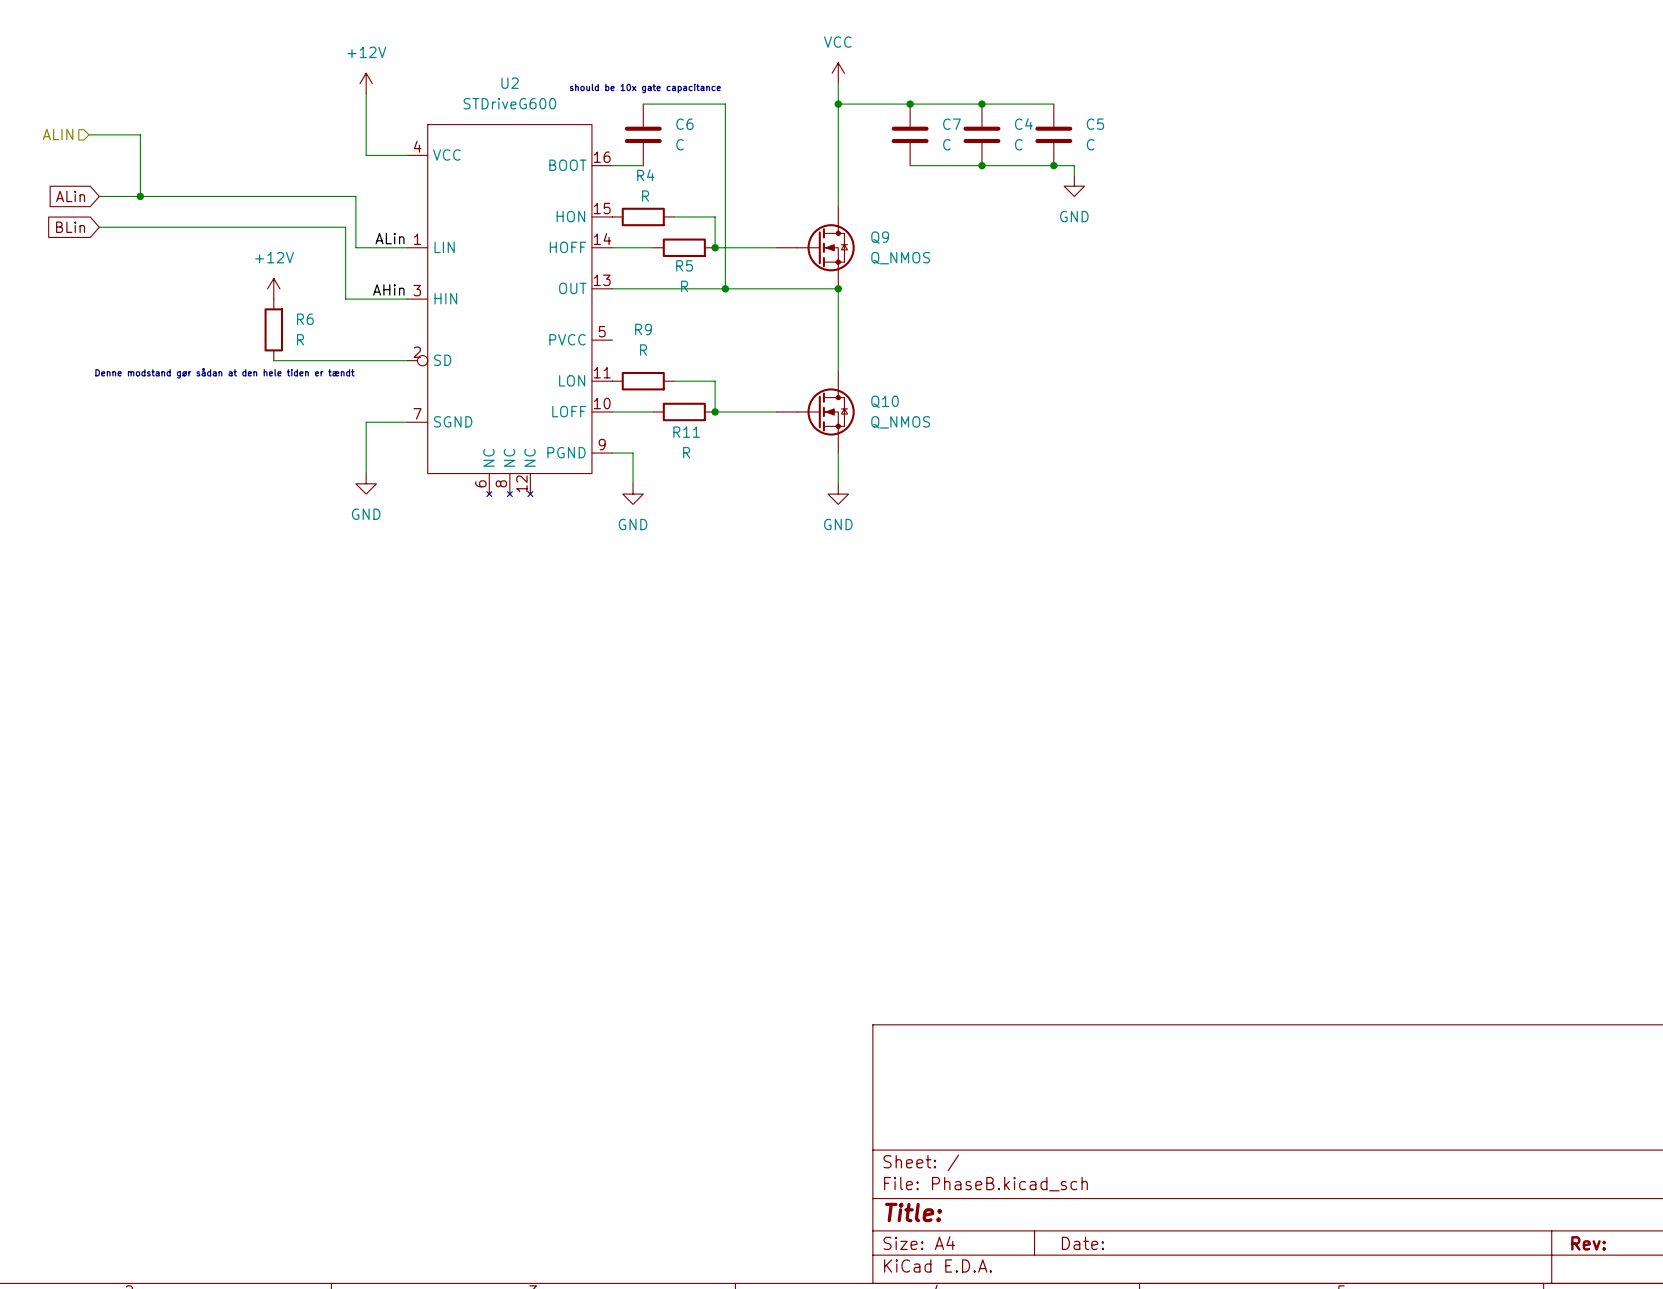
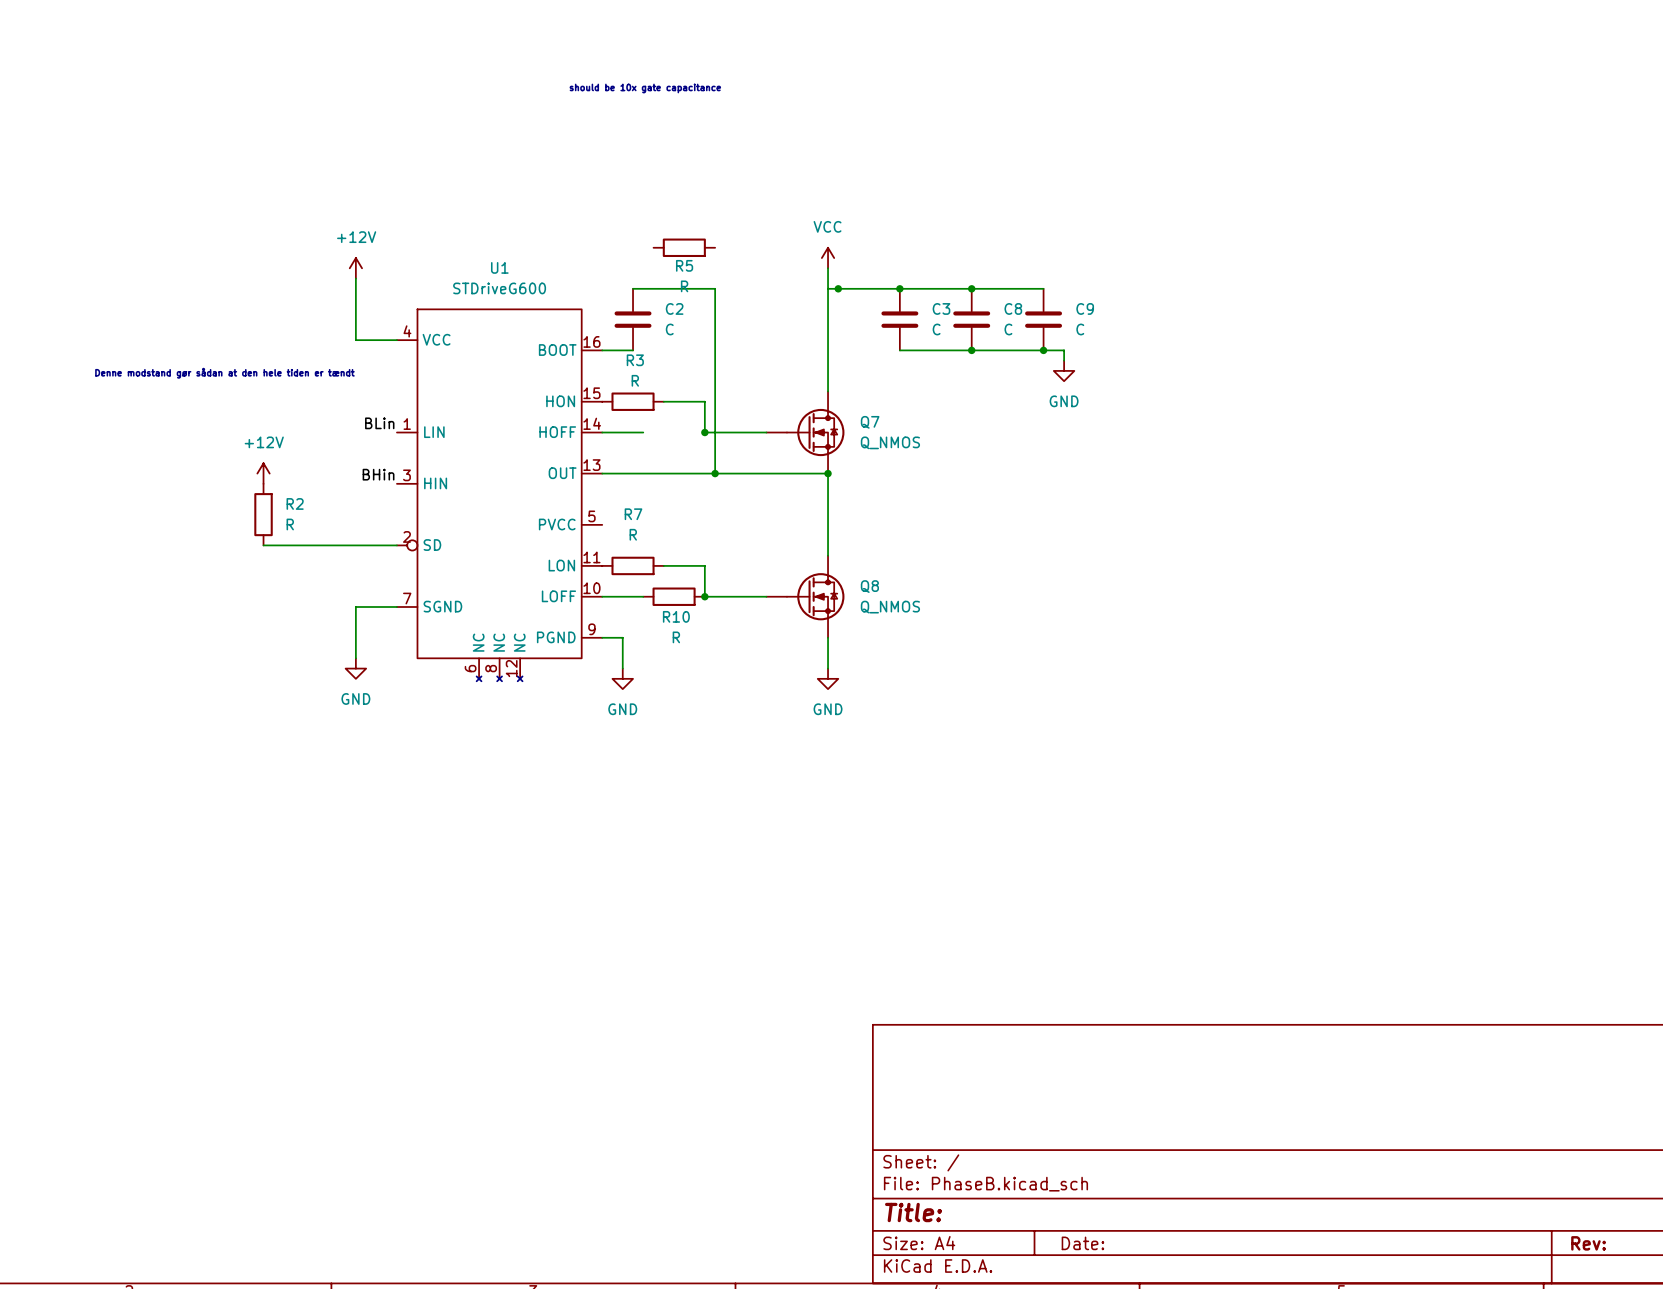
power symbol position: VCC (838, 73) -> VCC (828, 258)
power symbol: +12V (366, 83) -> none
wire: (838, 83) (838, 206) -> (828, 268) (828, 391)
wire: (366, 93) (366, 155) (407, 155) -> (355, 278) (355, 340) (396, 340)
wire: (643, 104) (725, 104) (725, 288) -> none
wire: (838, 104) (1053, 104) -> none
junction: (838, 104) -> none
junction: (910, 104) -> none
junction: (981, 104) -> none
hierarchical label: ALIN (58, 134) -> none
wire: (89, 134) (140, 134) (140, 196) -> none
C6: C (643, 134) -> none
C7: C (910, 134) -> none
C4: C (981, 134) -> none
C5: C (1053, 134) -> none
wire: (612, 165) (643, 165) -> (602, 350) (633, 350)
wire: (910, 165) (1074, 165) (1074, 175) -> (899, 350) (1064, 350) (1064, 360)
junction: (981, 165) -> none
junction: (1053, 165) -> none
power symbol: GND (1074, 186) -> none
global label: ALin (70, 196) -> none
wire: (99, 196) (355, 196) (355, 247) (407, 247) -> none
junction: (140, 196) -> none
R4: R (643, 216) -> none
wire: (674, 216) (715, 216) (715, 247) (776, 247) -> (663, 401) (704, 401) (704, 432) (766, 432)
global label: BLin (70, 227) -> none
wire: (99, 227) (345, 227) (345, 299) (407, 299) -> none
label: ALin (390, 238) -> none
wire: (612, 247) (653, 247) -> (602, 432) (643, 432)
junction: (715, 247) -> none
Q9: Q_NMOS (815, 247) -> none
power symbol position: +12V (273, 288) -> +12V (355, 268)
wire: (612, 288) (633, 288) -> none
wire: (715, 288) (828, 288) -> none
junction: (725, 288) -> none
wire: (838, 288) (838, 370) -> (838, 288) (1043, 288)
junction: none -> (899, 288)
junction: none -> (971, 288)
label: AHin (388, 289) -> none
U2: STDriveG600 (509, 310) -> none
C2: none -> C (633, 319)
C3: none -> C (899, 319)
C8: none -> C (971, 319)
C9: none -> C (1043, 319)
R6: R (273, 329) -> none
junction: none -> (971, 350)
junction: none -> (1043, 350)
wire: (273, 360) (407, 360) -> (263, 545) (396, 545)
power symbol: none -> GND (1064, 370)
R9: R (643, 381) -> none
wire: (674, 381) (715, 381) -> (715, 288) (715, 381)
R3: none -> R (633, 401)
wire: (612, 411) (653, 411) -> (602, 596) (643, 596)
R11: R (684, 411) -> none
wire: (715, 411) (776, 411) -> (715, 411) (715, 473)
junction position: (715, 411) -> (704, 432)
Q10: Q_NMOS (815, 411) -> none
wire: (407, 422) (366, 422) (366, 473) -> (396, 606) (355, 606) (355, 658)
label: none -> BLin (379, 423)
Q7: none -> Q_NMOS (805, 432)
wire: (612, 453) (633, 453) (633, 483) -> (602, 637) (622, 637) (622, 668)
wire: (838, 453) (838, 483) -> (828, 637) (828, 668)
power symbol: none -> +12V (263, 473)
wire: none -> (602, 473) (828, 473) (828, 555)
junction: none -> (715, 473)
junction: none -> (828, 473)
label: none -> BHin (378, 474)
power symbol: GND (366, 483) -> none
power symbol: GND (633, 494) -> none
power symbol: GND (838, 494) -> none
U1: none -> STDriveG600 (499, 495)
R2: none -> R (263, 514)
R7: none -> R (633, 565)
wire: none -> (663, 565) (704, 565) (704, 596) (766, 596)
R10: none -> R (674, 596)
junction: none -> (704, 596)
Q8: none -> Q_NMOS (805, 596)
power symbol: none -> GND (355, 668)
power symbol: none -> GND (622, 678)
power symbol: none -> GND (828, 678)

